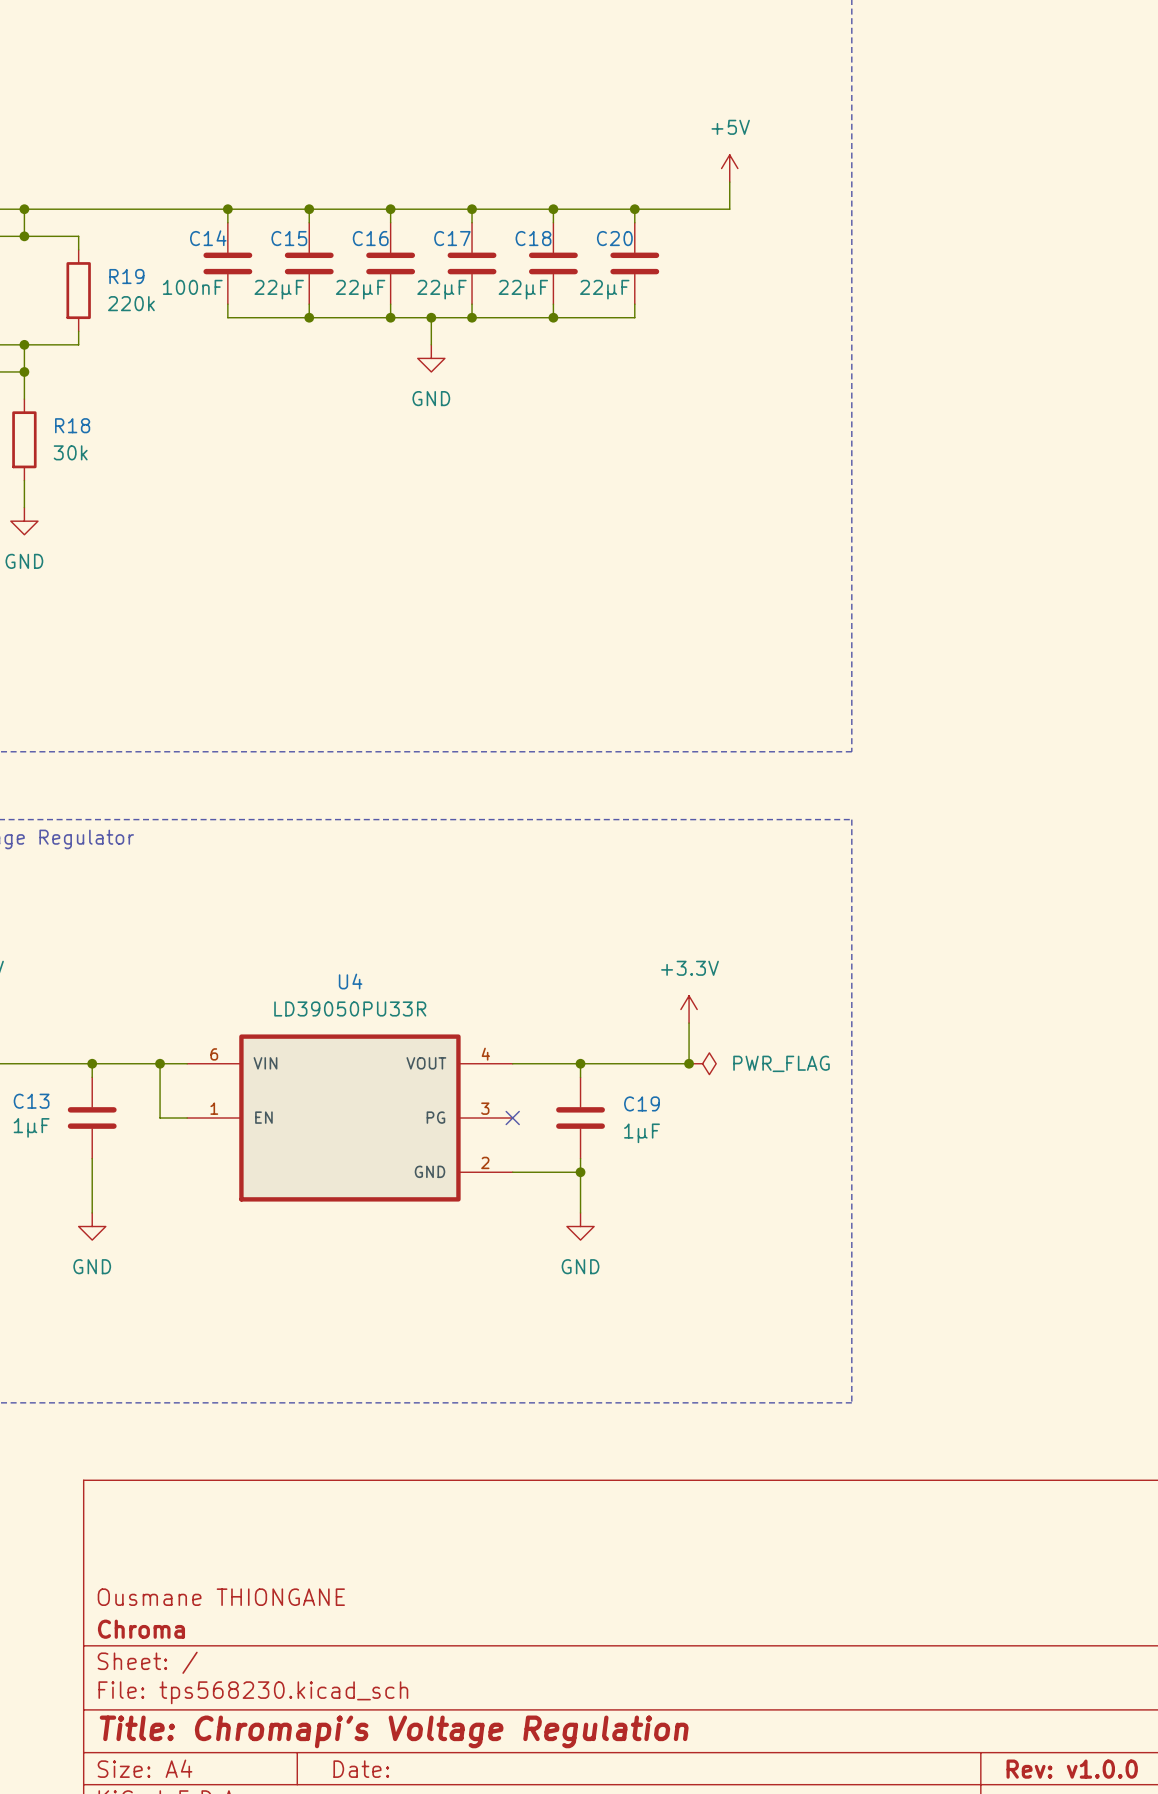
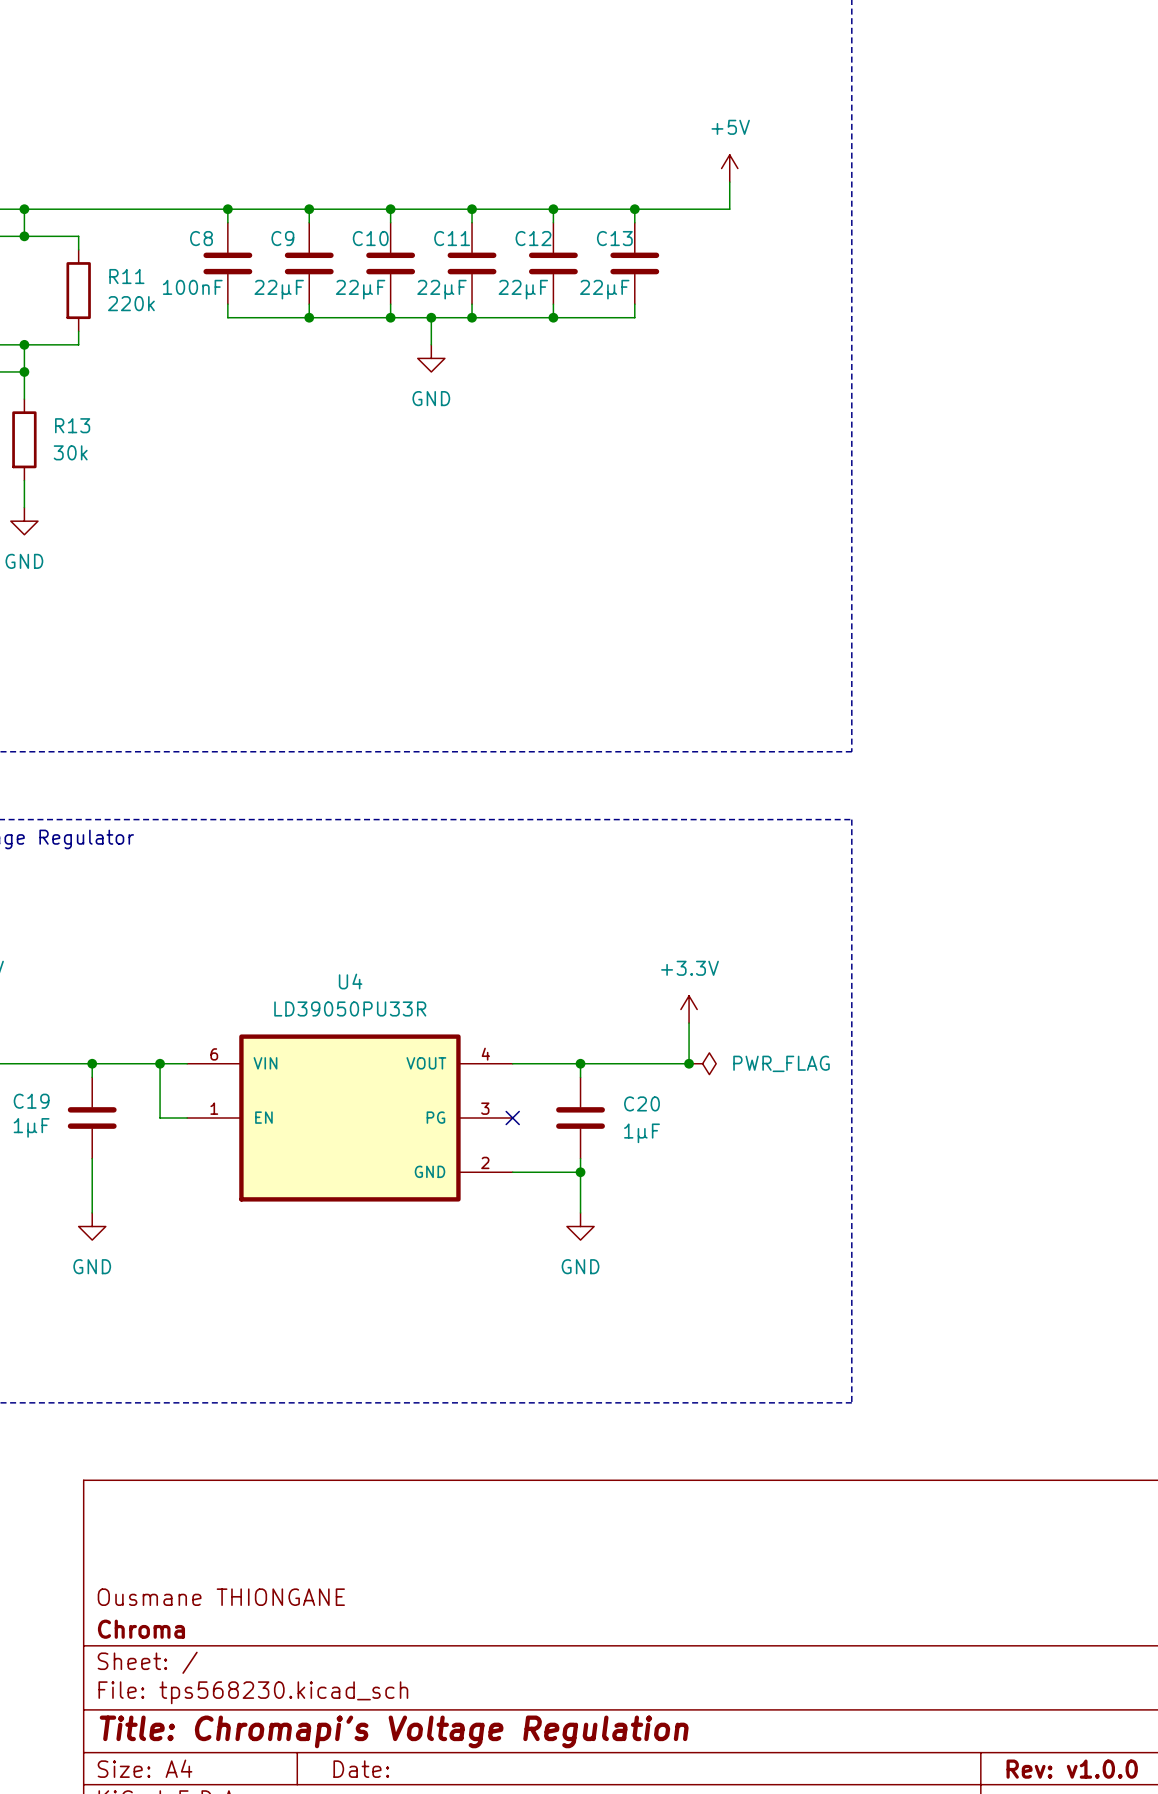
C14 name: C14 (208, 238) -> C8 (201, 238)
C15 name: C15 (289, 238) -> C9 (282, 238)
C16 name: C16 (370, 238) -> C10 (370, 238)
C17 name: C17 (452, 238) -> C11 (452, 238)
C18 name: C18 (533, 238) -> C12 (533, 238)
C20 name: C20 (614, 238) -> C13 (614, 238)
R19 name: R19 (126, 276) -> R11 (126, 276)
R18 name: R18 (72, 425) -> R13 (72, 425)
C13 name: C13 (31, 1101) -> C19 (31, 1101)
C19 name: C19 (641, 1103) -> C20 (641, 1103)

